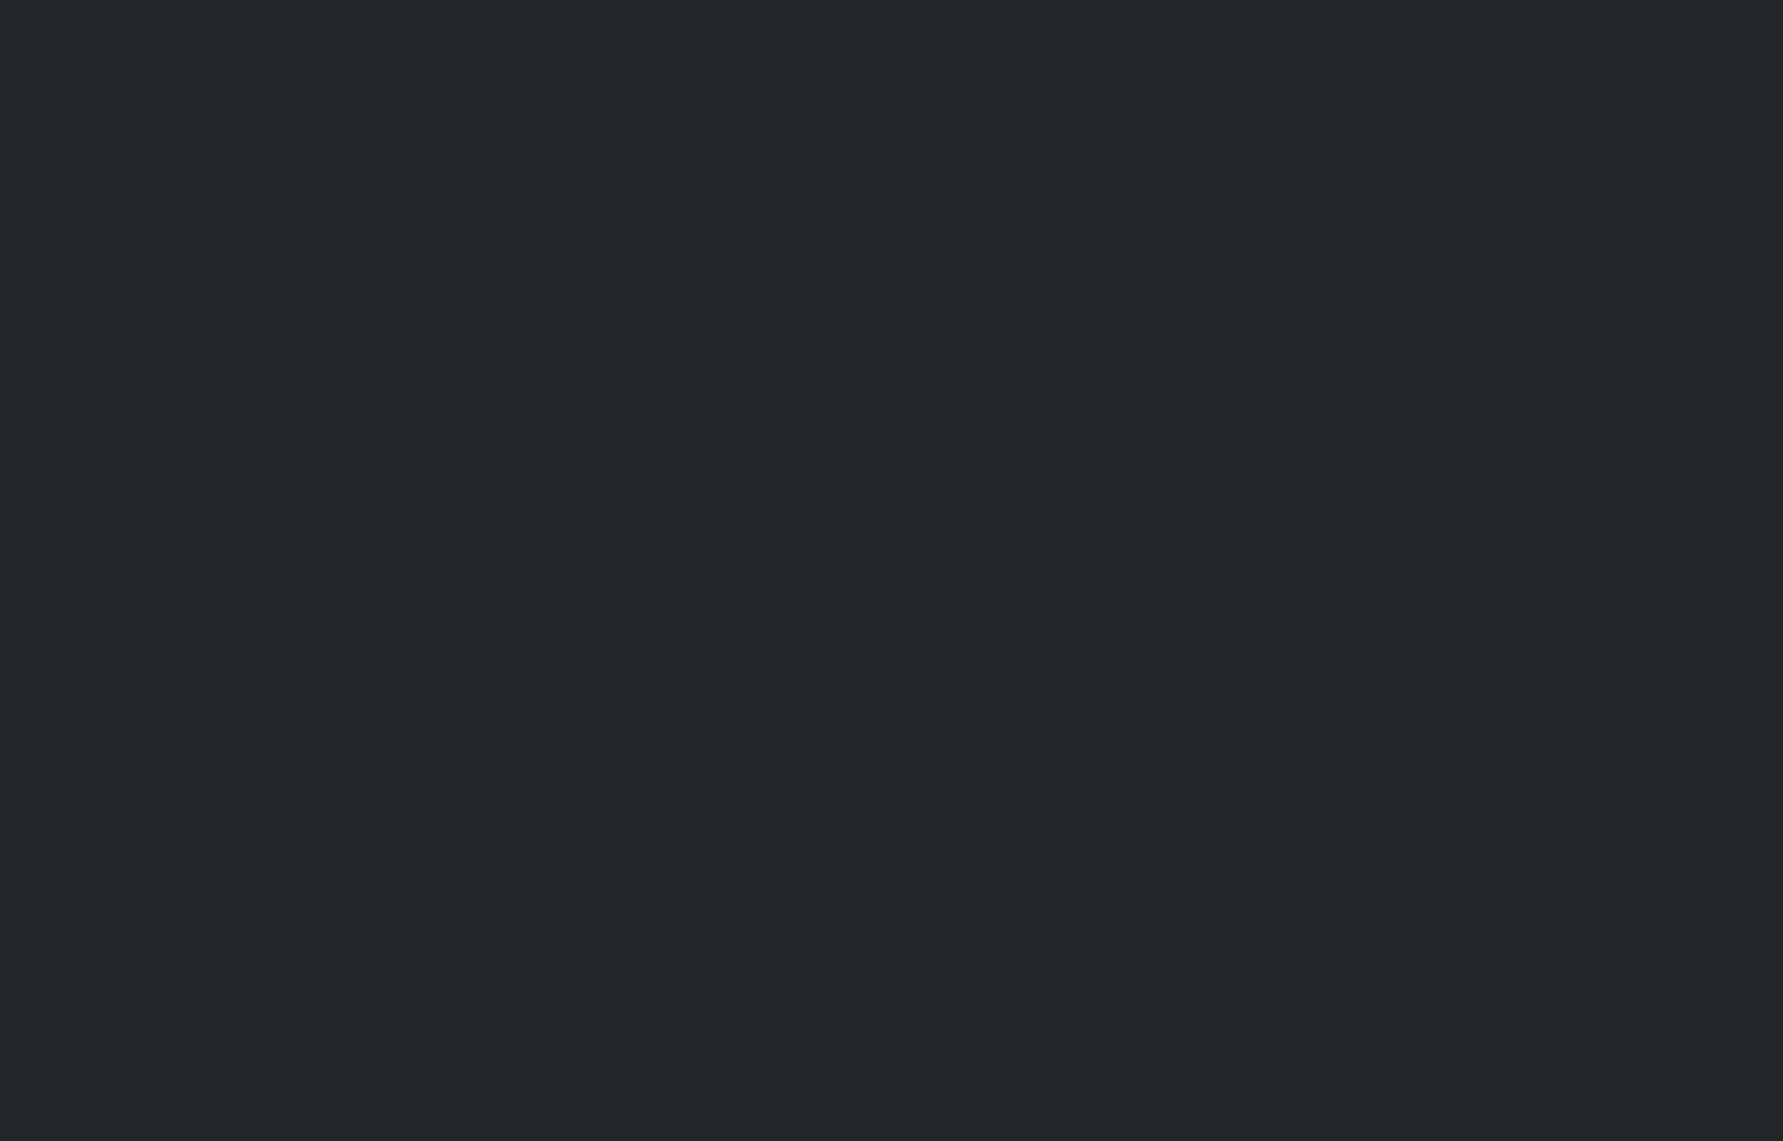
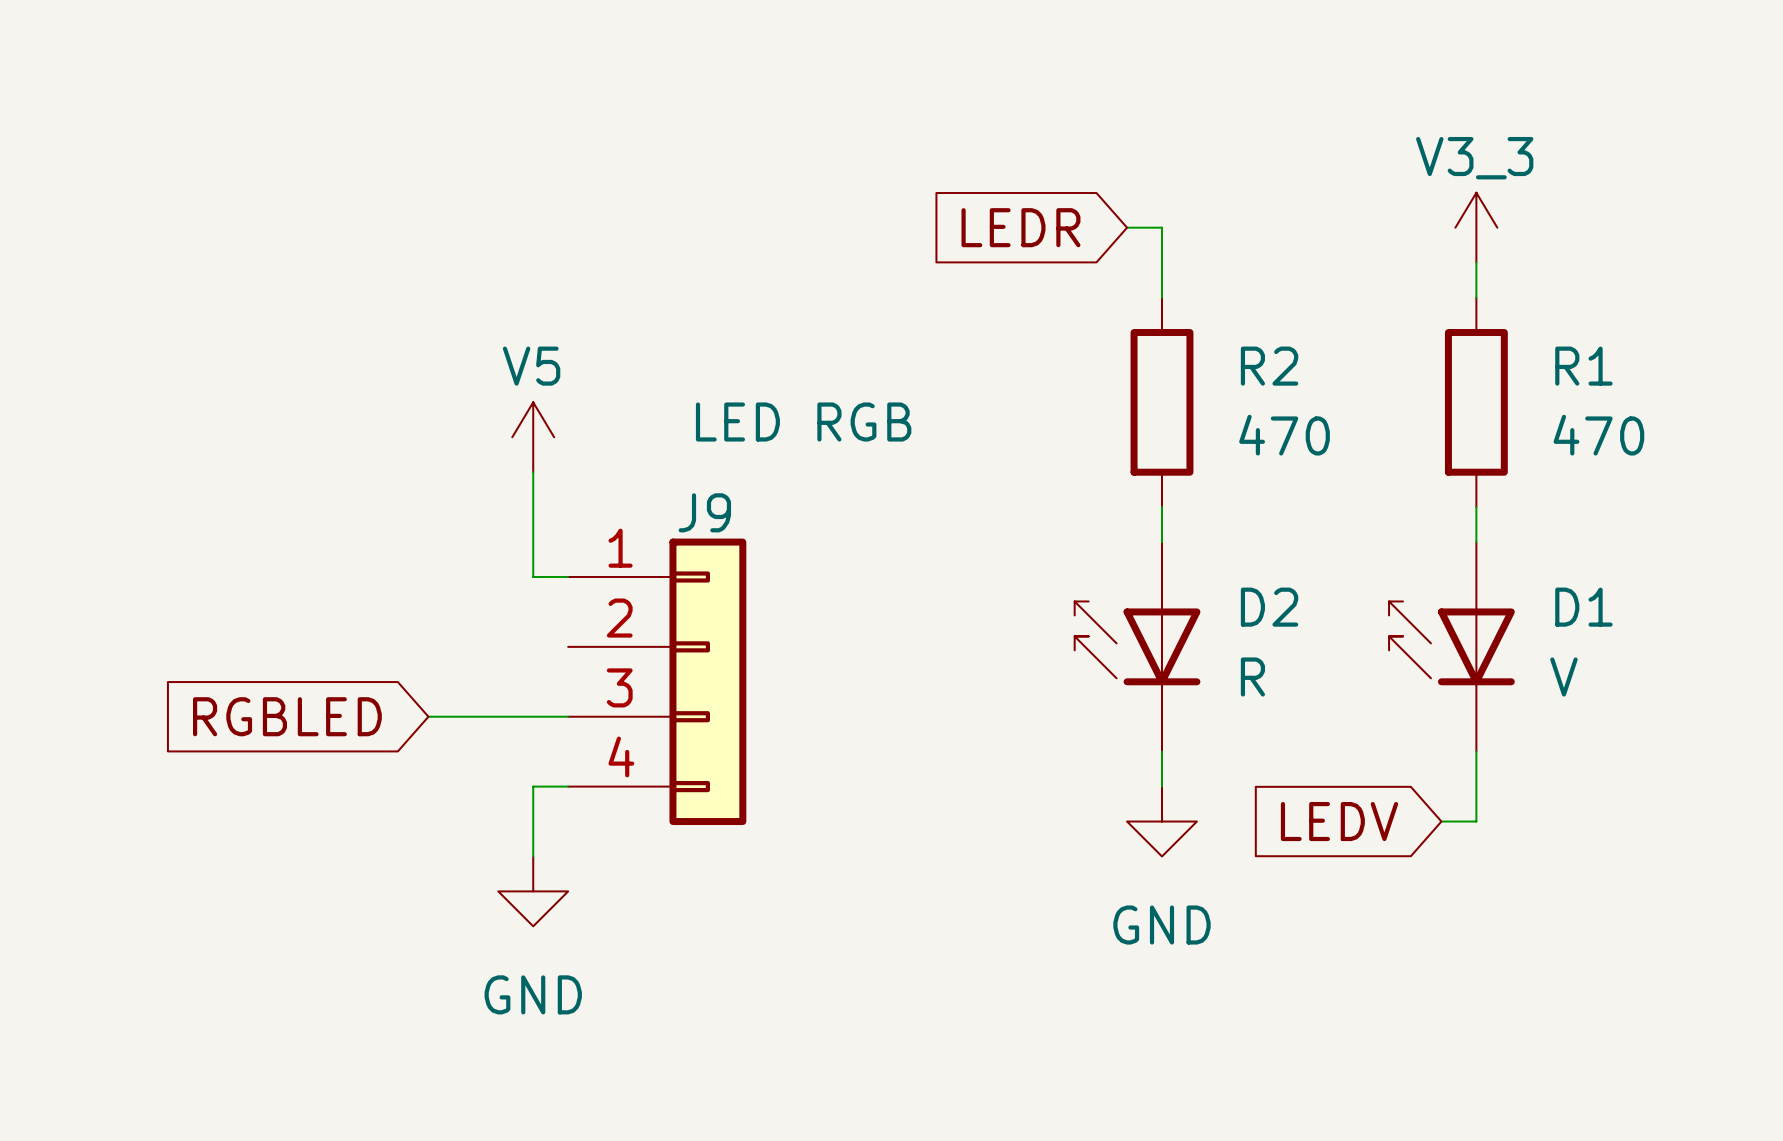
global label: none -> LEDR (1020, 227)
wire: none -> (1127, 227) (1161, 227) (1161, 297)
power symbol: none -> V3_3 (1476, 227)
wire: none -> (1476, 262) (1476, 297)
R2: none -> 470 (1161, 402)
R1: none -> 470 (1476, 402)
power symbol: none -> V5 (533, 437)
wire: none -> (533, 472) (533, 577) (568, 577)
wire: none -> (1161, 507) (1161, 542)
wire: none -> (1476, 507) (1476, 542)
D2: none -> R (1137, 646)
D1: none -> V (1451, 646)
J9: none -> LED RGB (657, 681)
global label: none -> RGBLED (287, 716)
wire: none -> (428, 716) (568, 716)
wire: none -> (1161, 751) (1161, 786)
wire: none -> (1476, 751) (1476, 821) (1441, 821)
wire: none -> (568, 786) (533, 786) (533, 856)
power symbol: none -> GND (1161, 821)
global label: none -> LEDV (1339, 821)
power symbol: none -> GND (533, 891)

